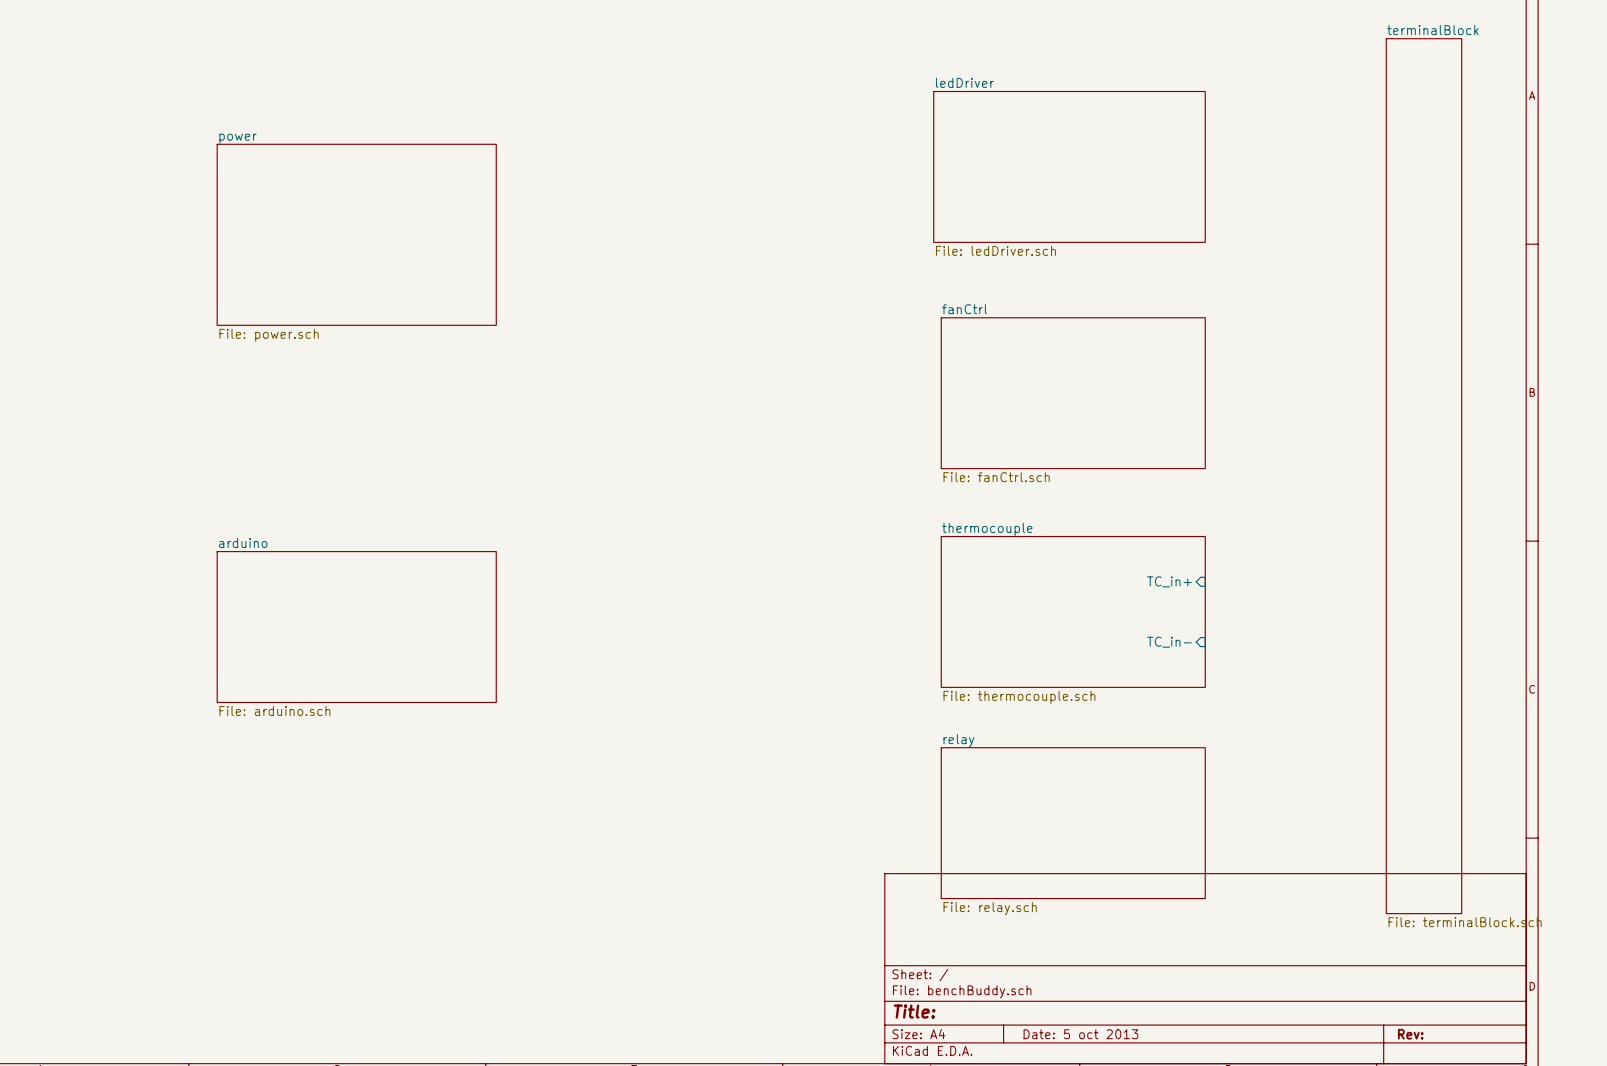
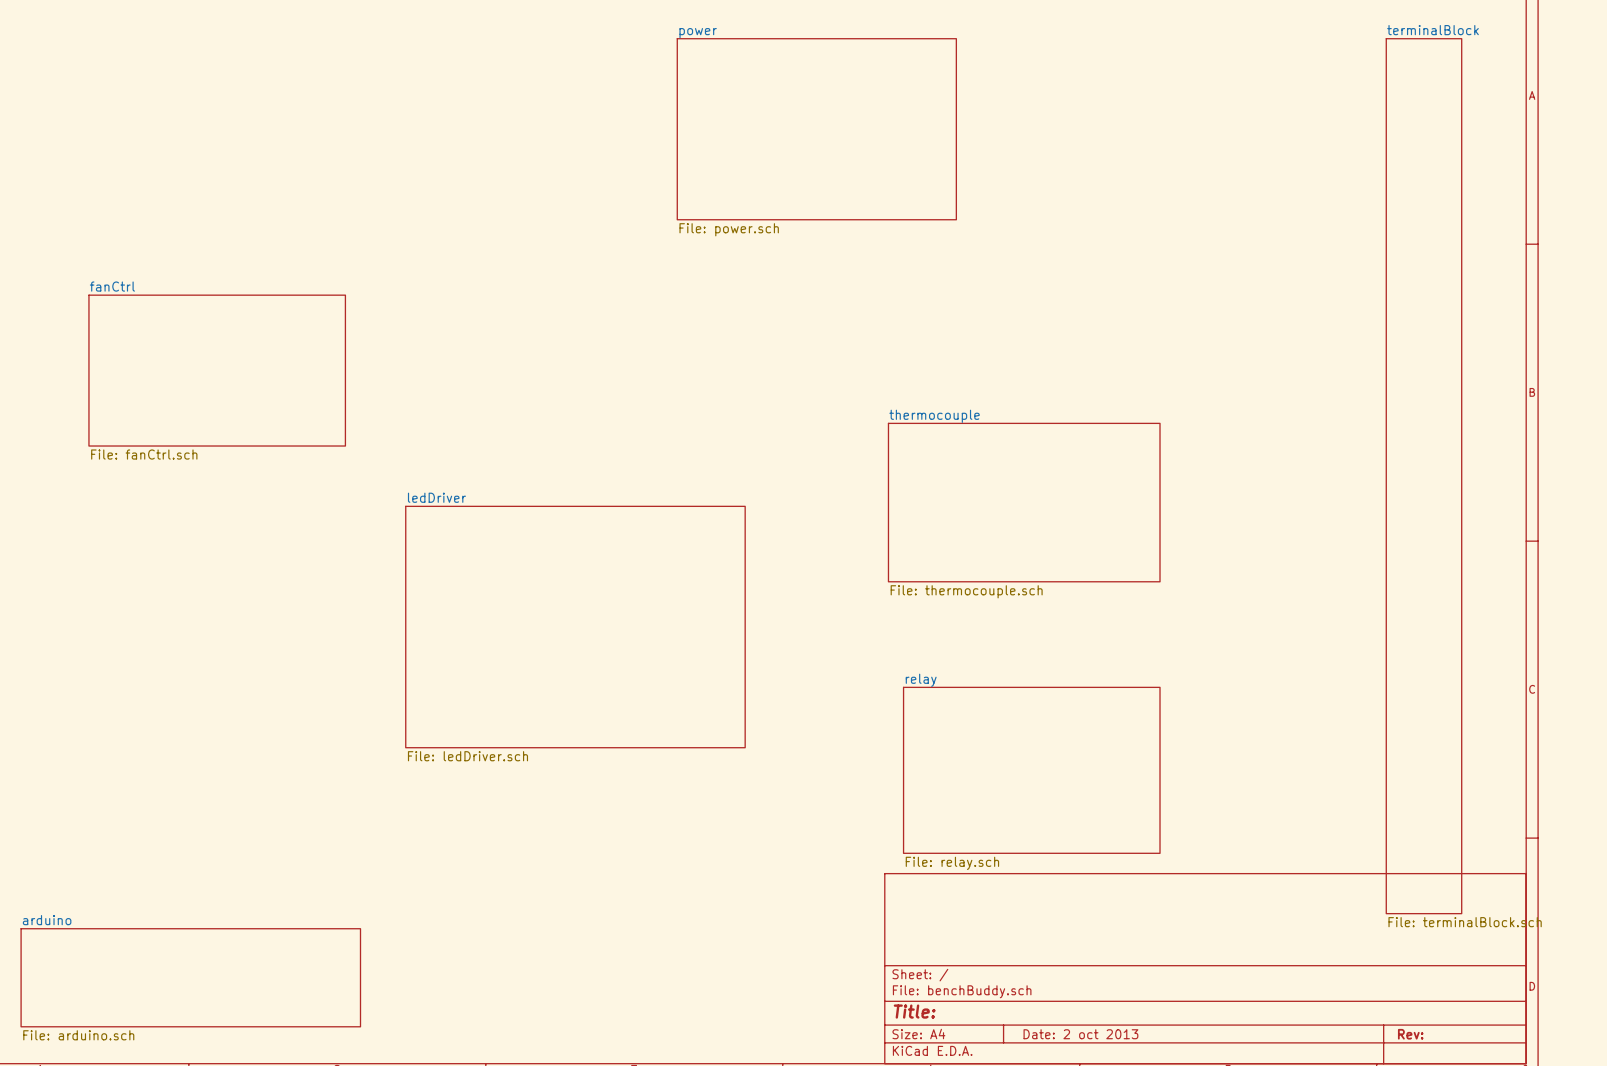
sheet power: none -> File: power.sch (816, 129)
sheet ledDriver: File: ledDriver.sch (1069, 166) -> none
sheet power: File: power.sch (356, 234) -> none
sheet fanCtrl: none -> File: fanCtrl.sch (217, 370)
sheet fanCtrl: File: fanCtrl.sch (1073, 393) -> none
sheet thermocouple: none -> File: thermocouple.sch (1024, 502)
sheet pin: TC_in+ (1169, 581) -> none
sheet thermocouple: File: thermocouple.sch (1073, 611) -> none
sheet arduino: File: arduino.sch (356, 627) -> none
sheet ledDriver: none -> File: ledDriver.sch (575, 627)
sheet pin: TC_in- (1169, 642) -> none
sheet relay: none -> File: relay.sch (1031, 770)
sheet relay: File: relay.sch (1073, 823) -> none
sheet arduino: none -> File: arduino.sch (190, 977)
title block: Date: 5 oct 2013 (1080, 1034) -> Date: 2 oct 2013 (1080, 1034)

